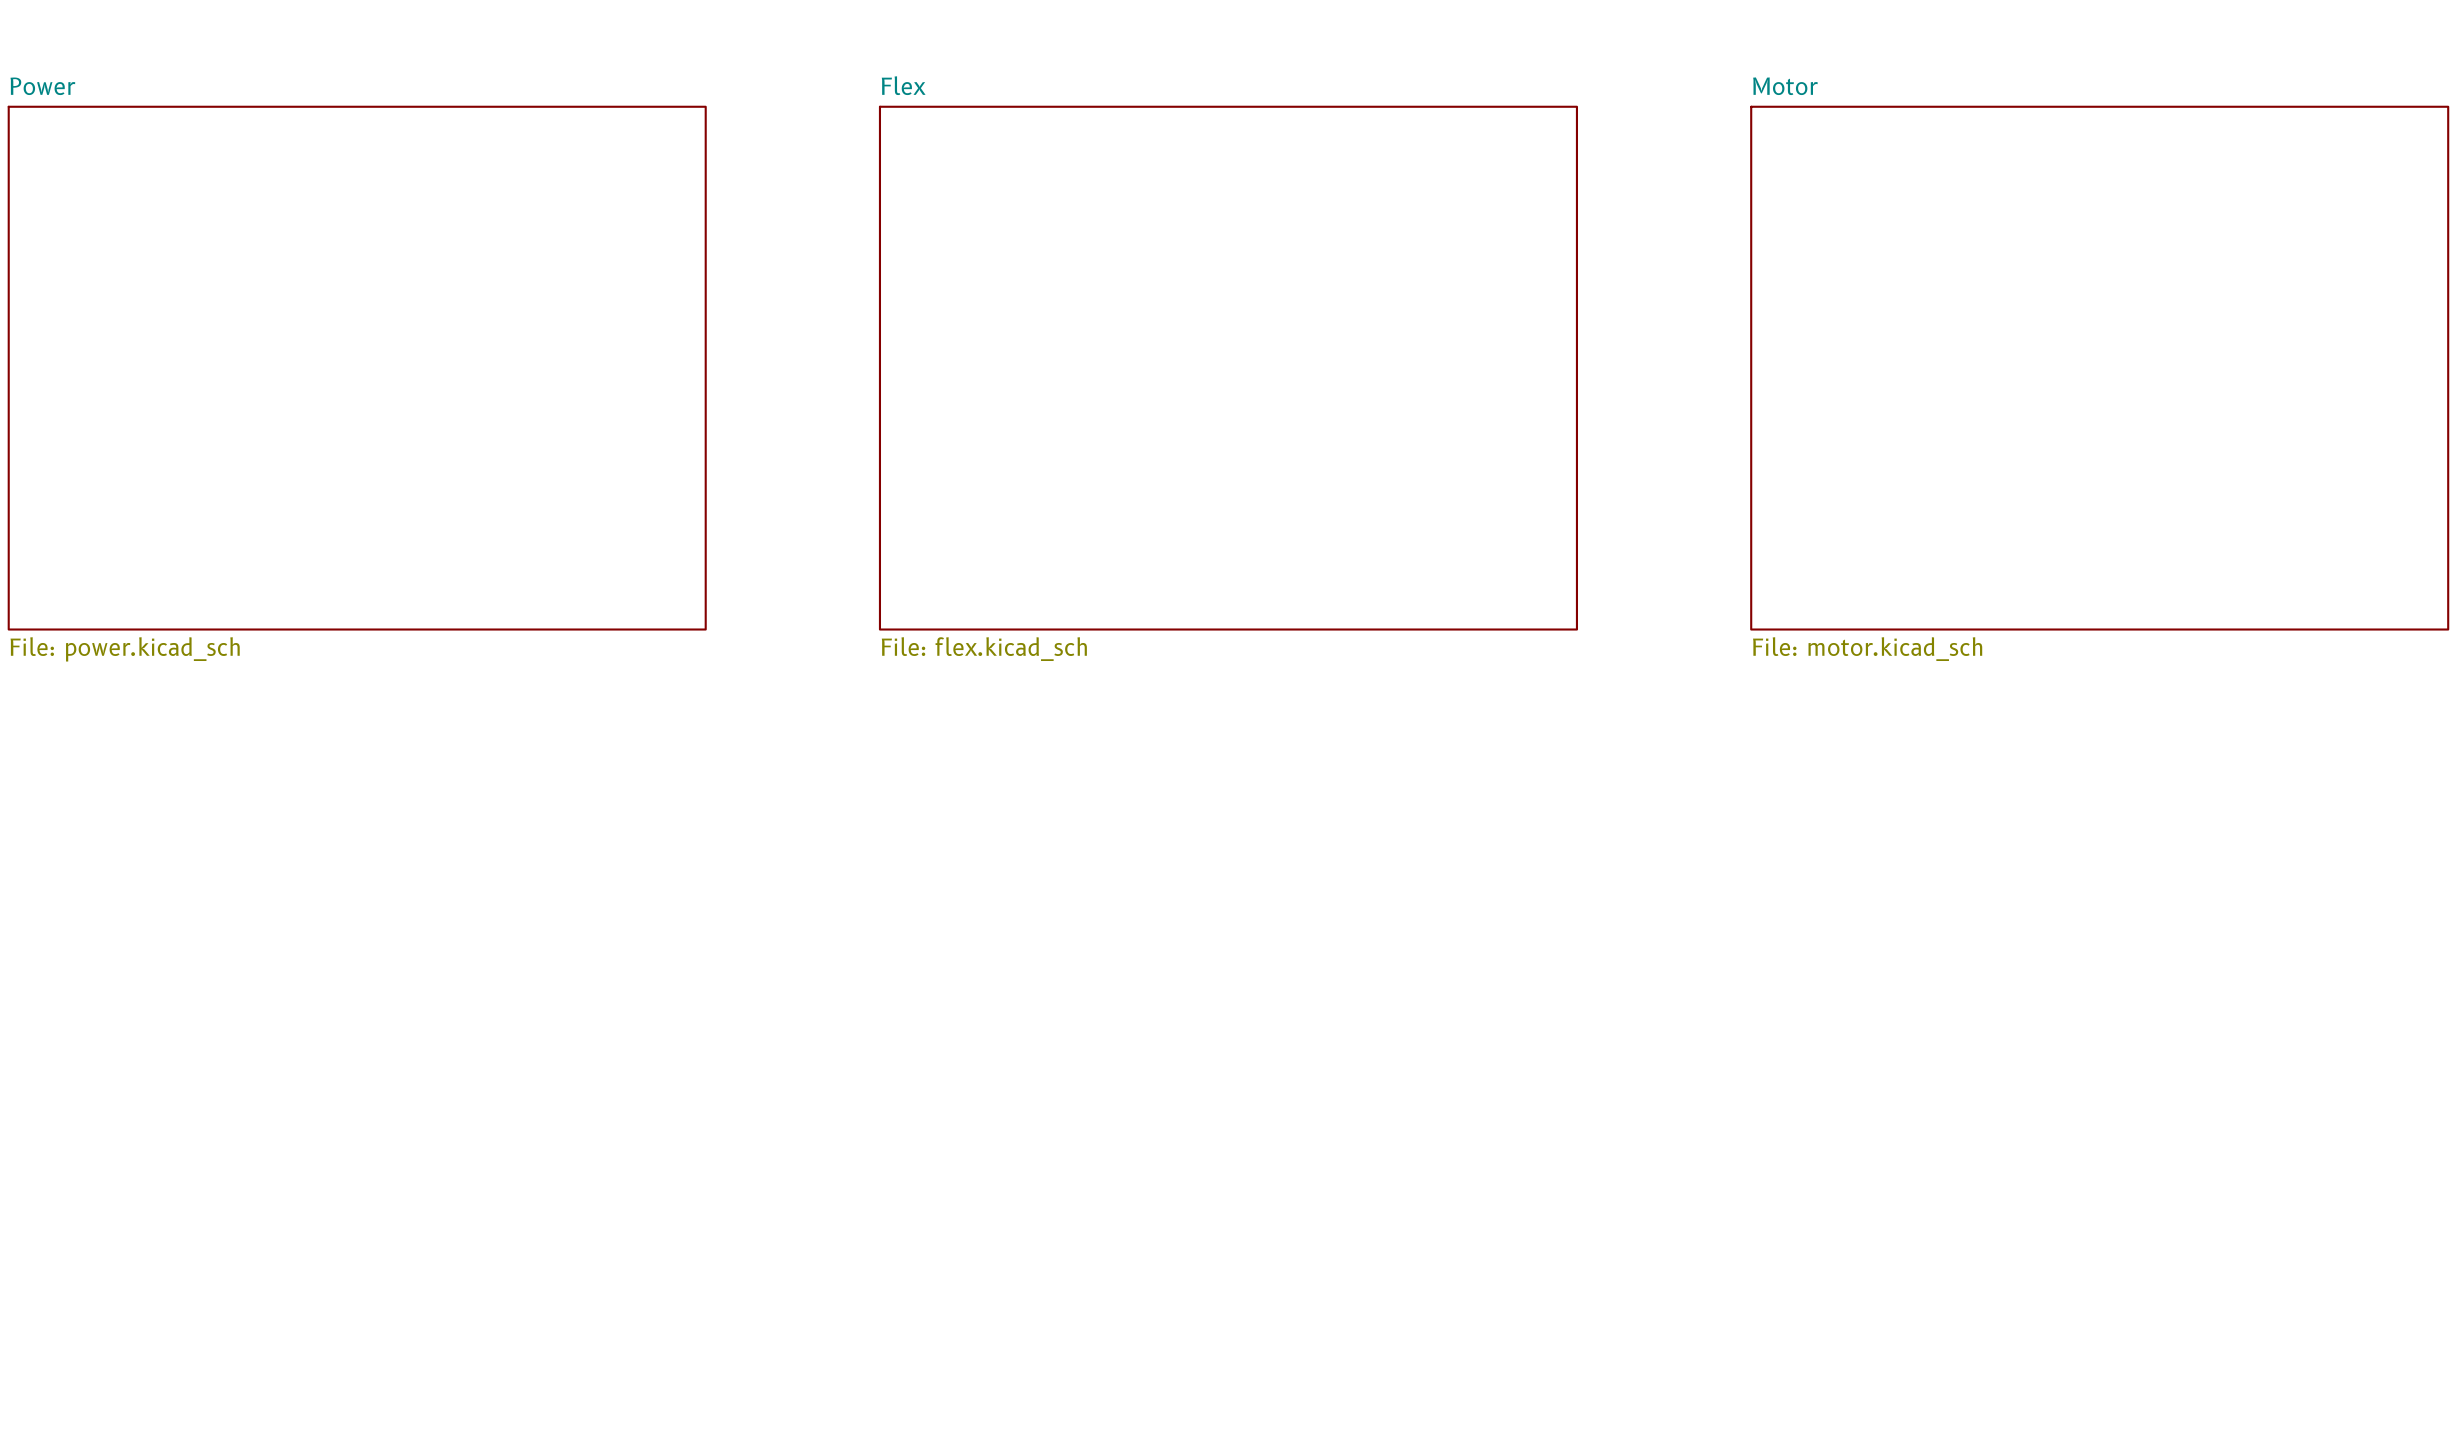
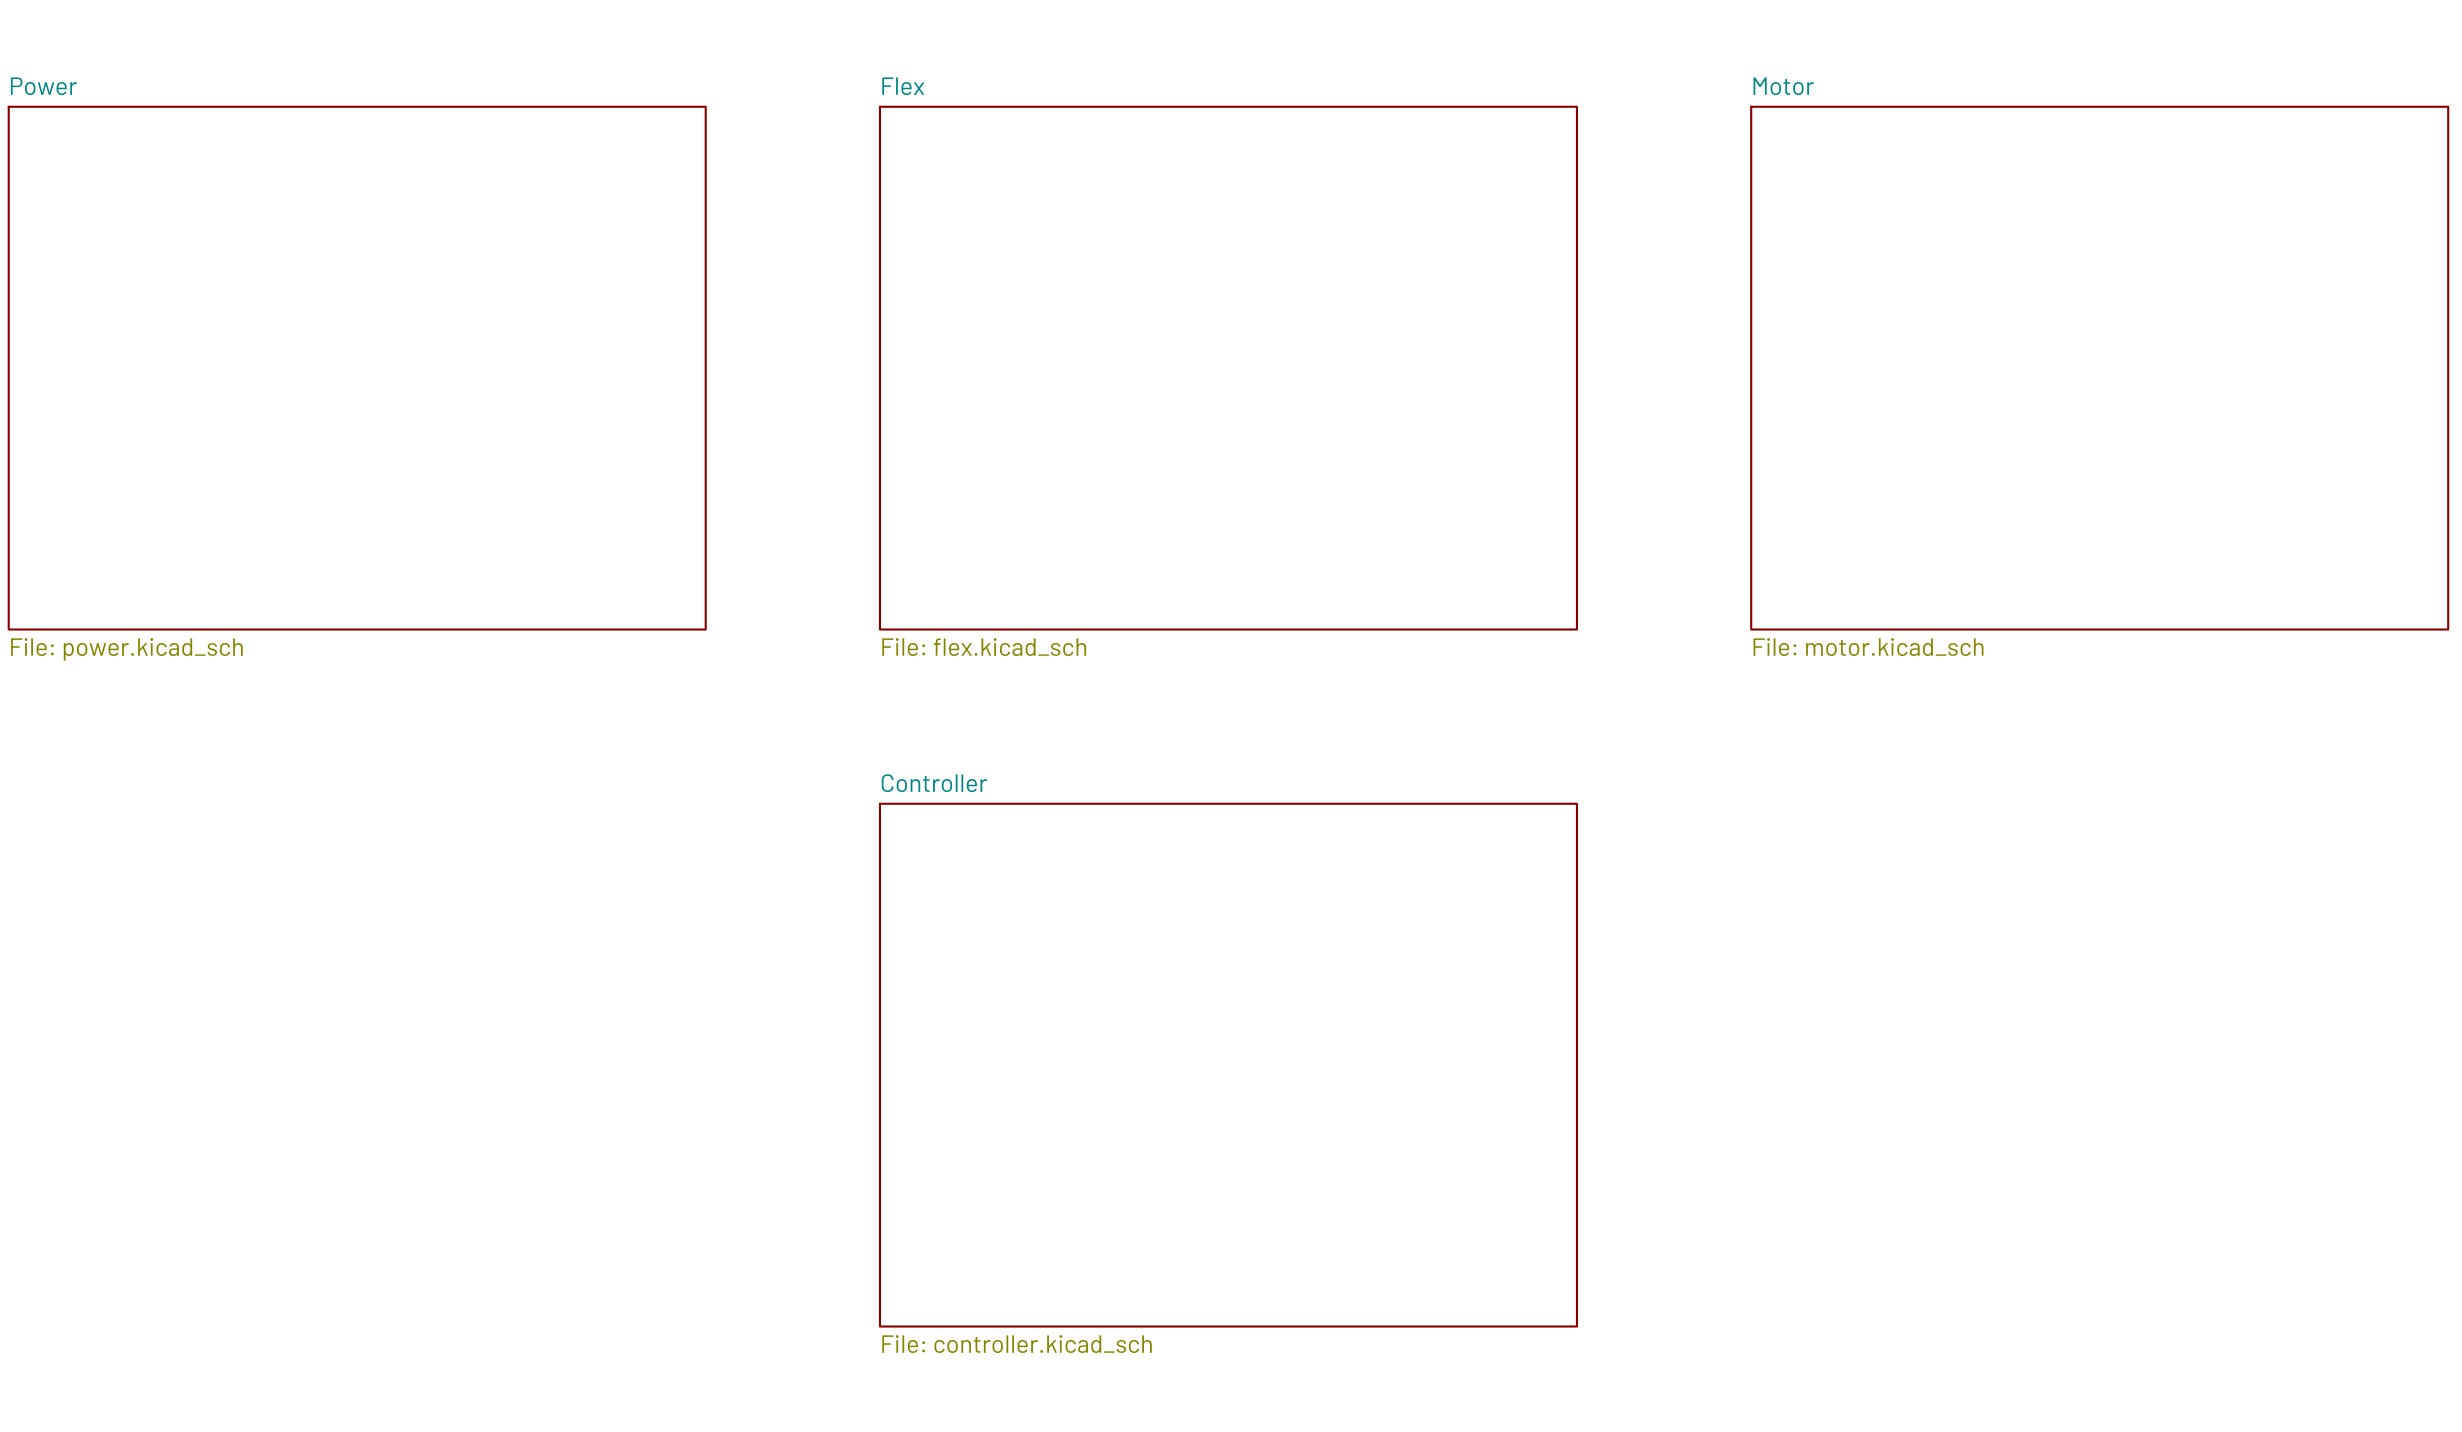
sheet Controller: none -> File: controller.kicad_sch (1228, 1065)

